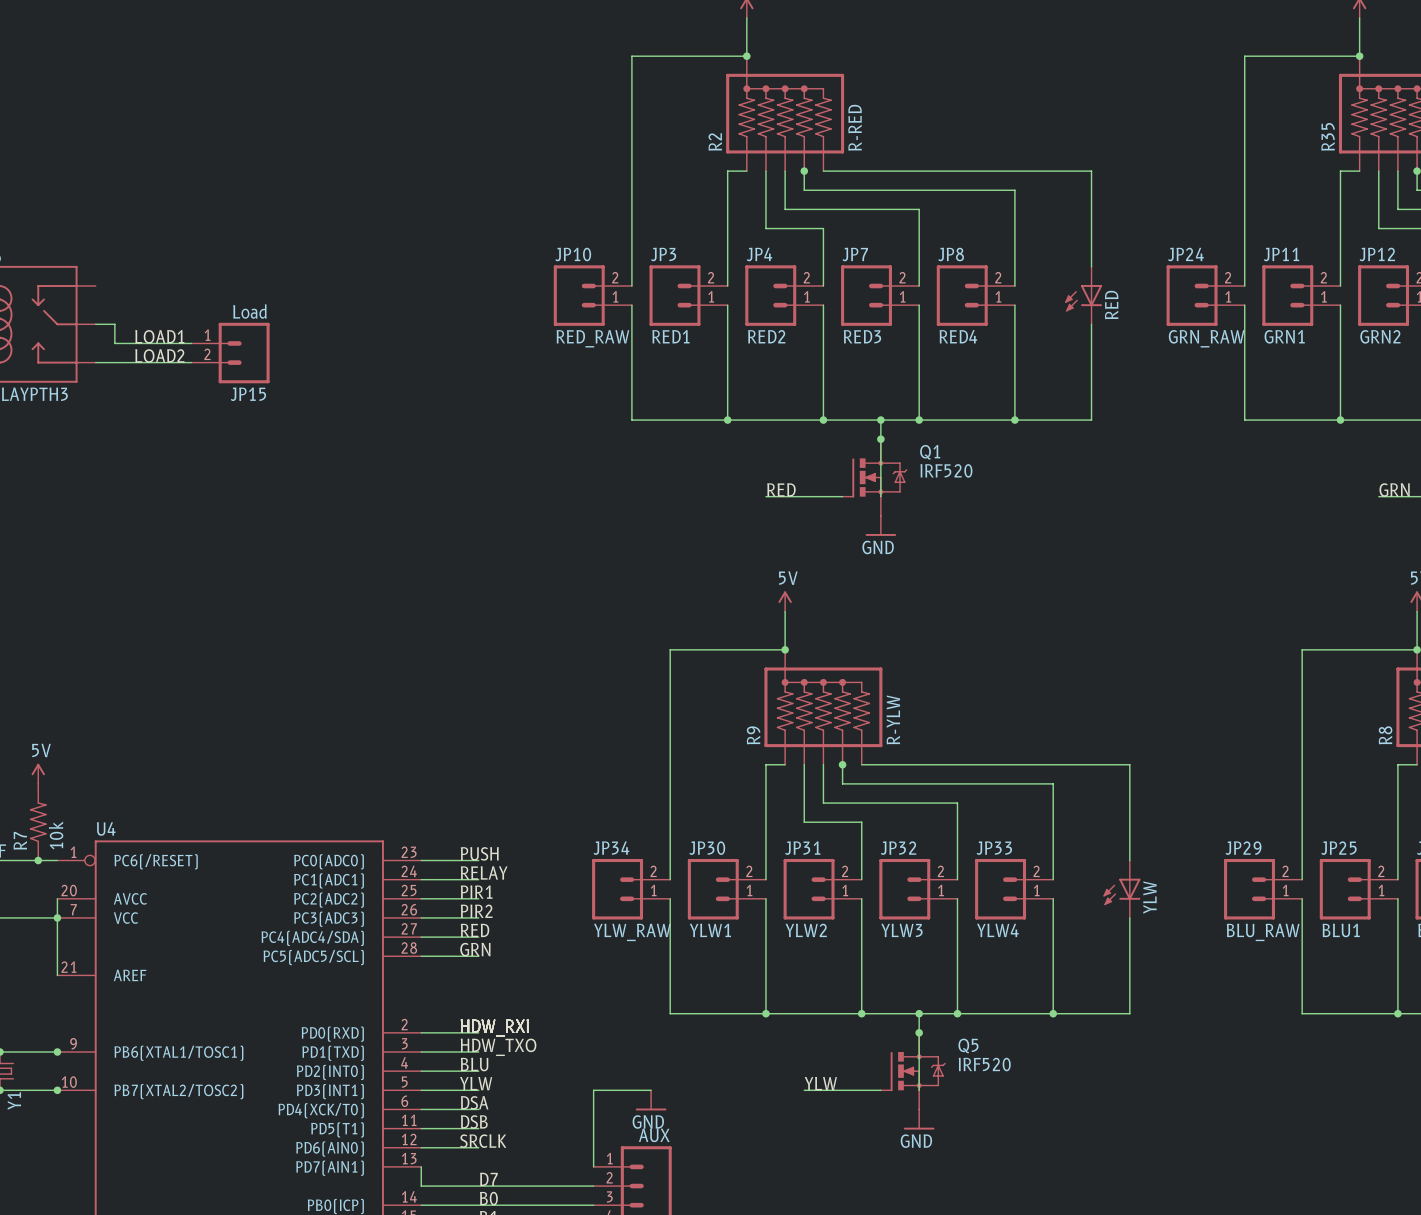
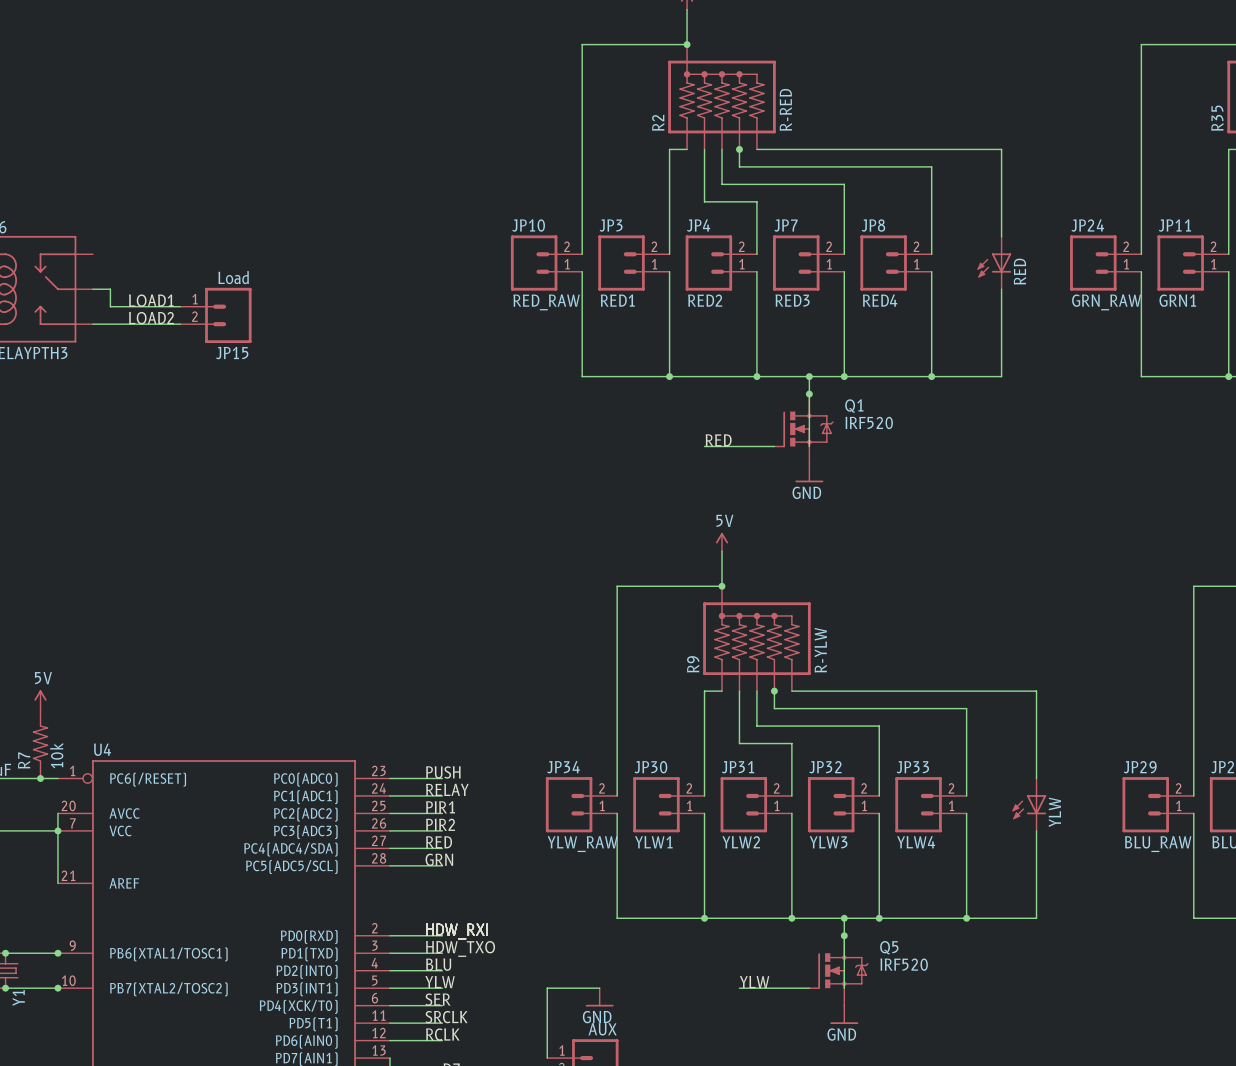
label: DSA (474, 1102) -> SER (438, 999)
label: DSB (474, 1121) -> SRCLK (446, 1017)
label: SRCLK (483, 1141) -> RCLK (442, 1034)

